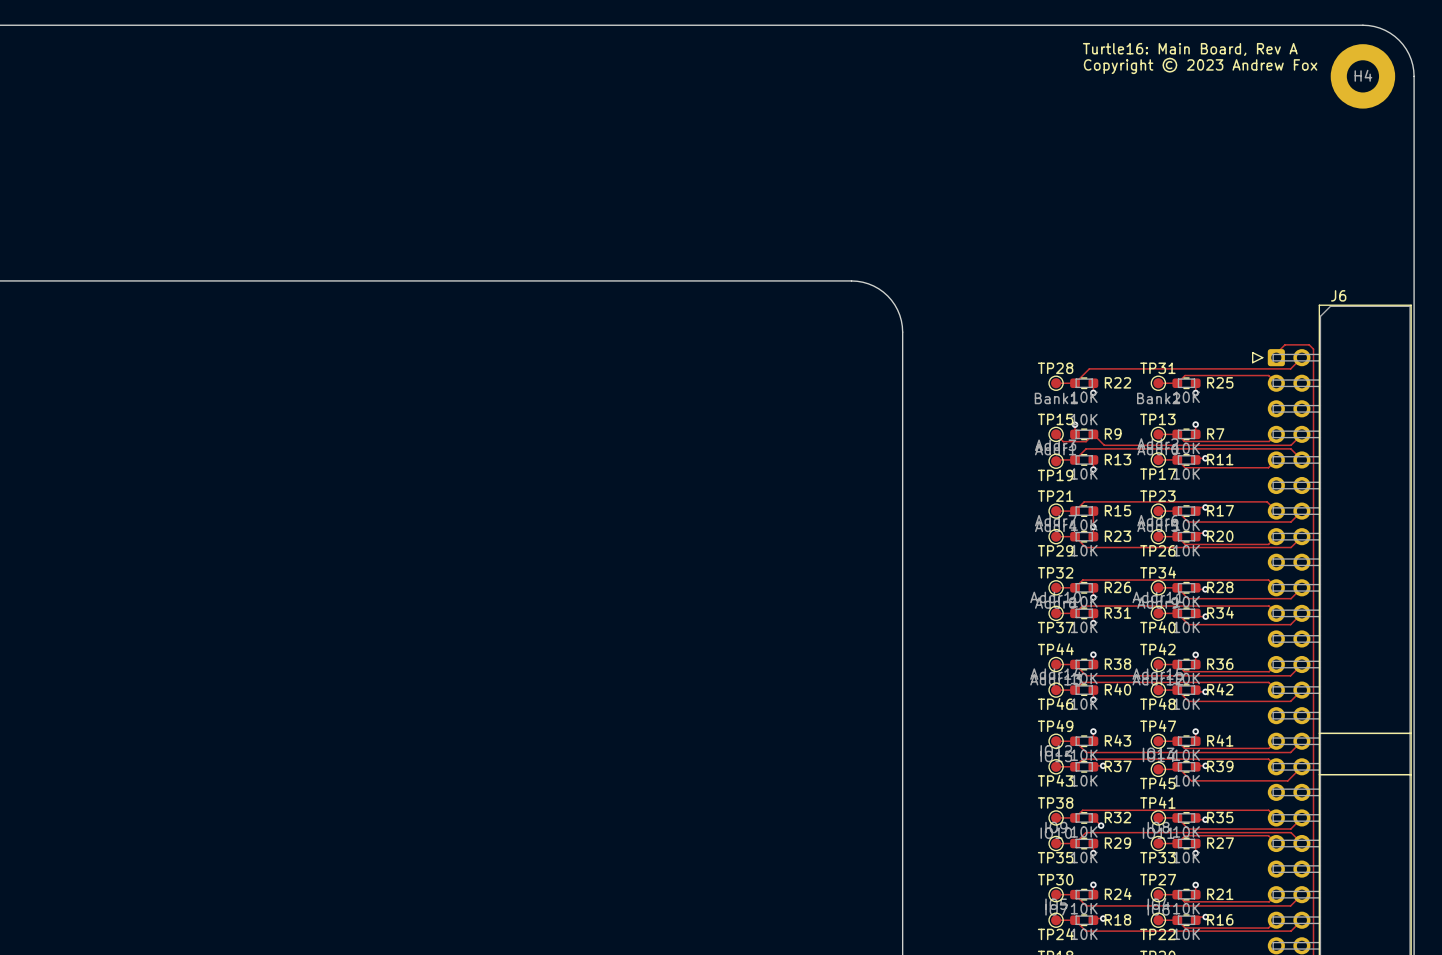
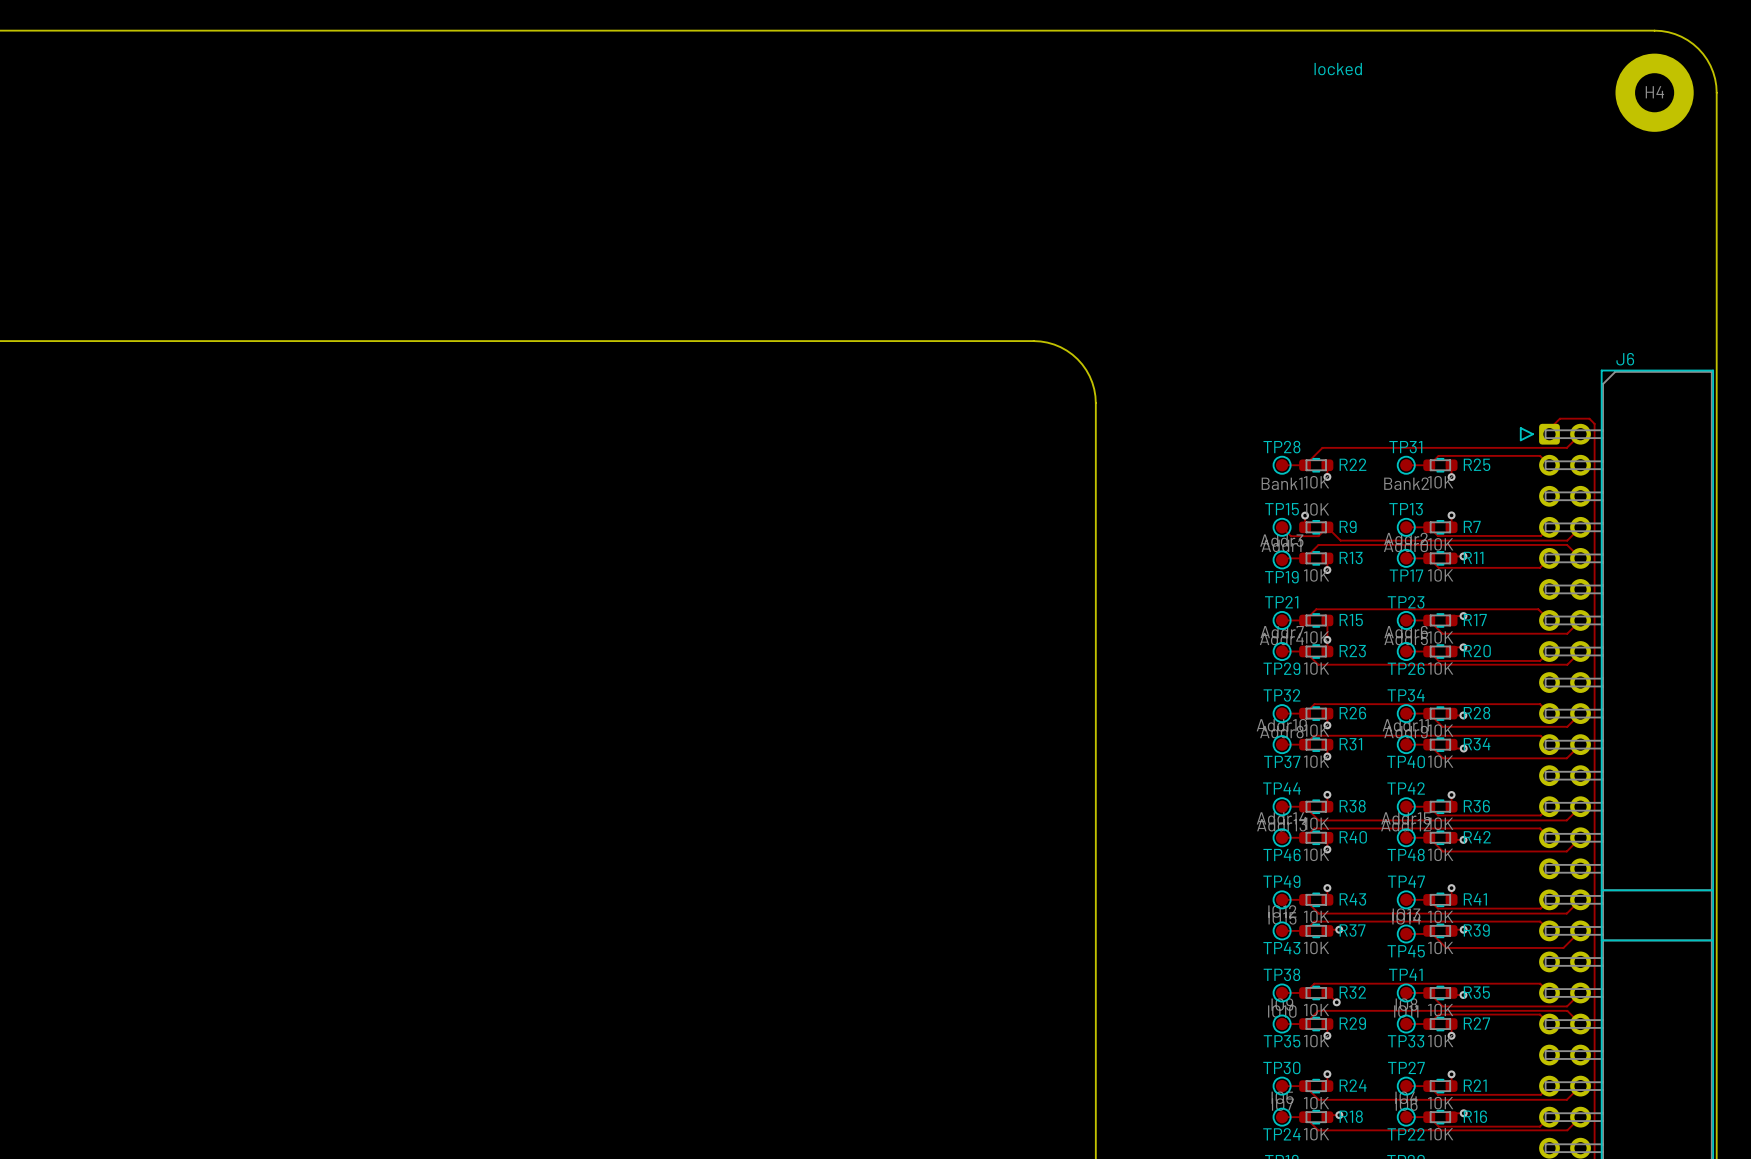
text: Turtle16: Main Board, Rev A (1190, 49) -> none
text: none -> locked (1338, 69)
text: Copyright © 2023 Andrew Fox (1200, 65) -> none

